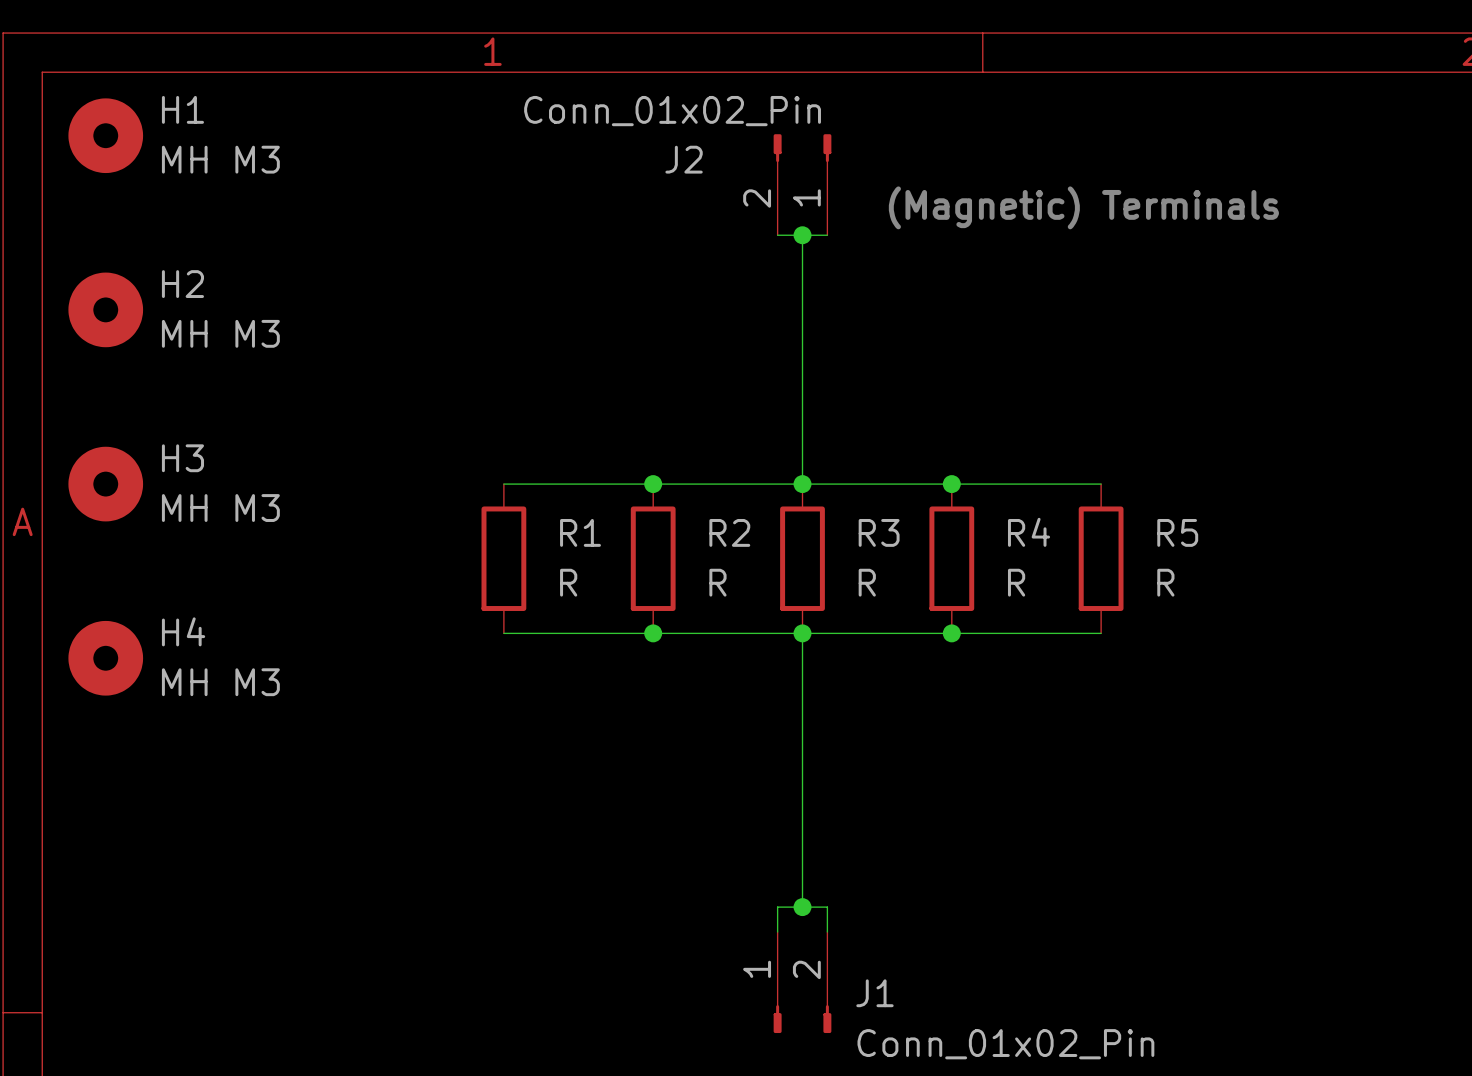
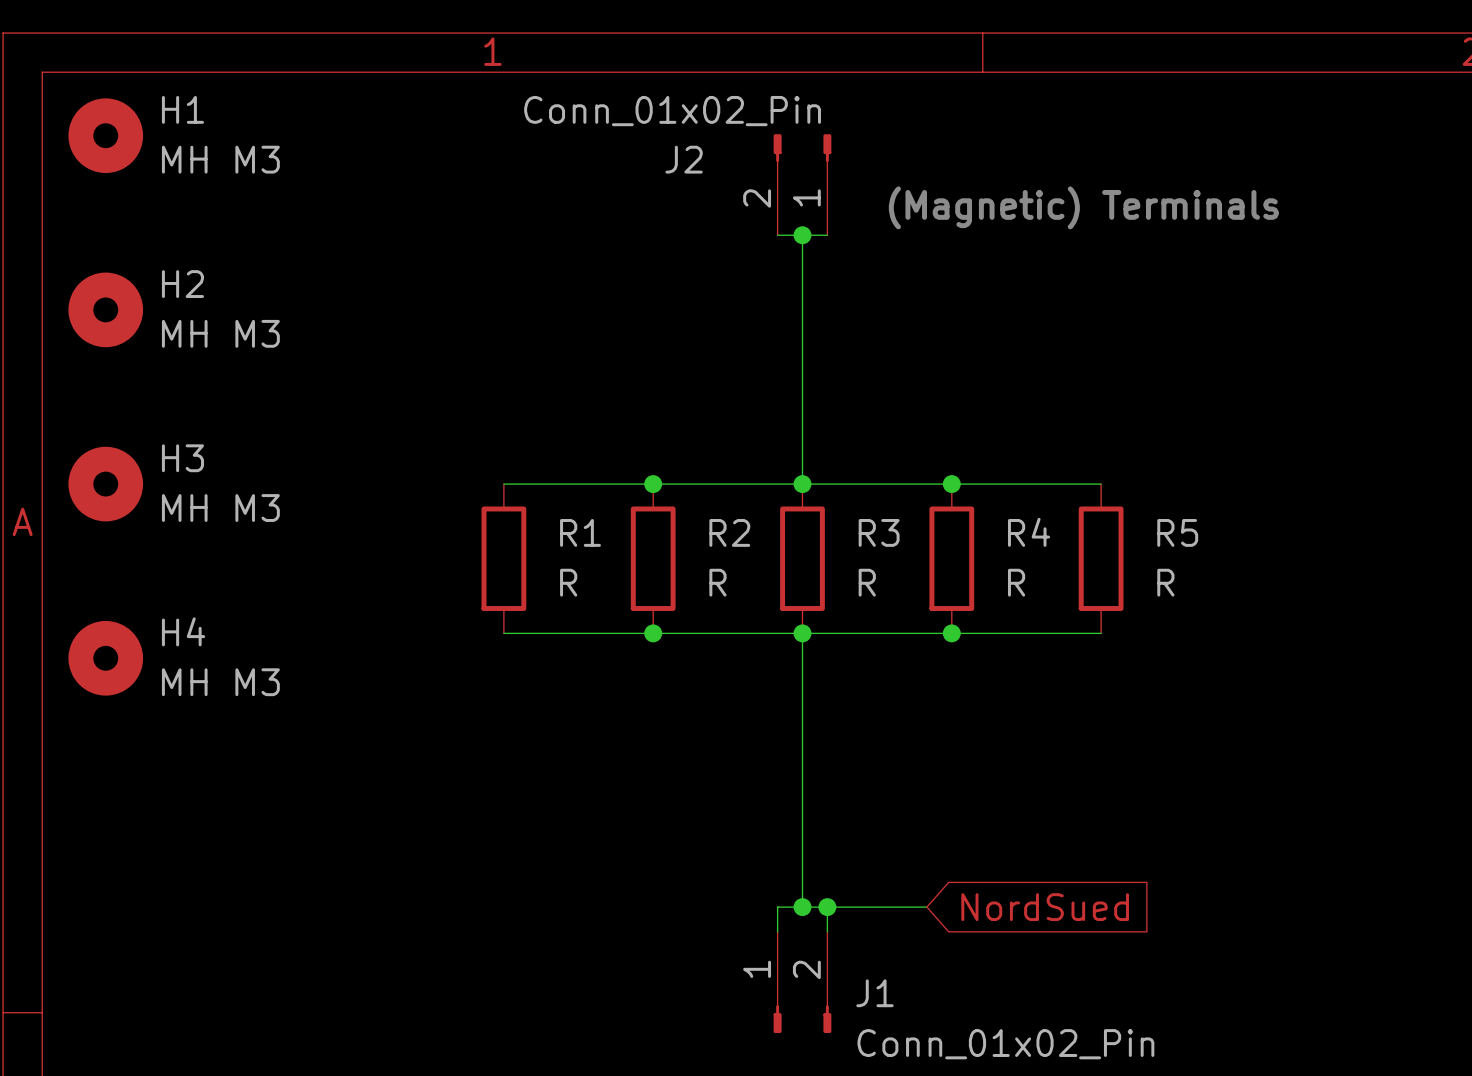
wire: none -> (827, 907) (926, 907)
junction: none -> (827, 907)
global label: none -> NordSued (1045, 907)

